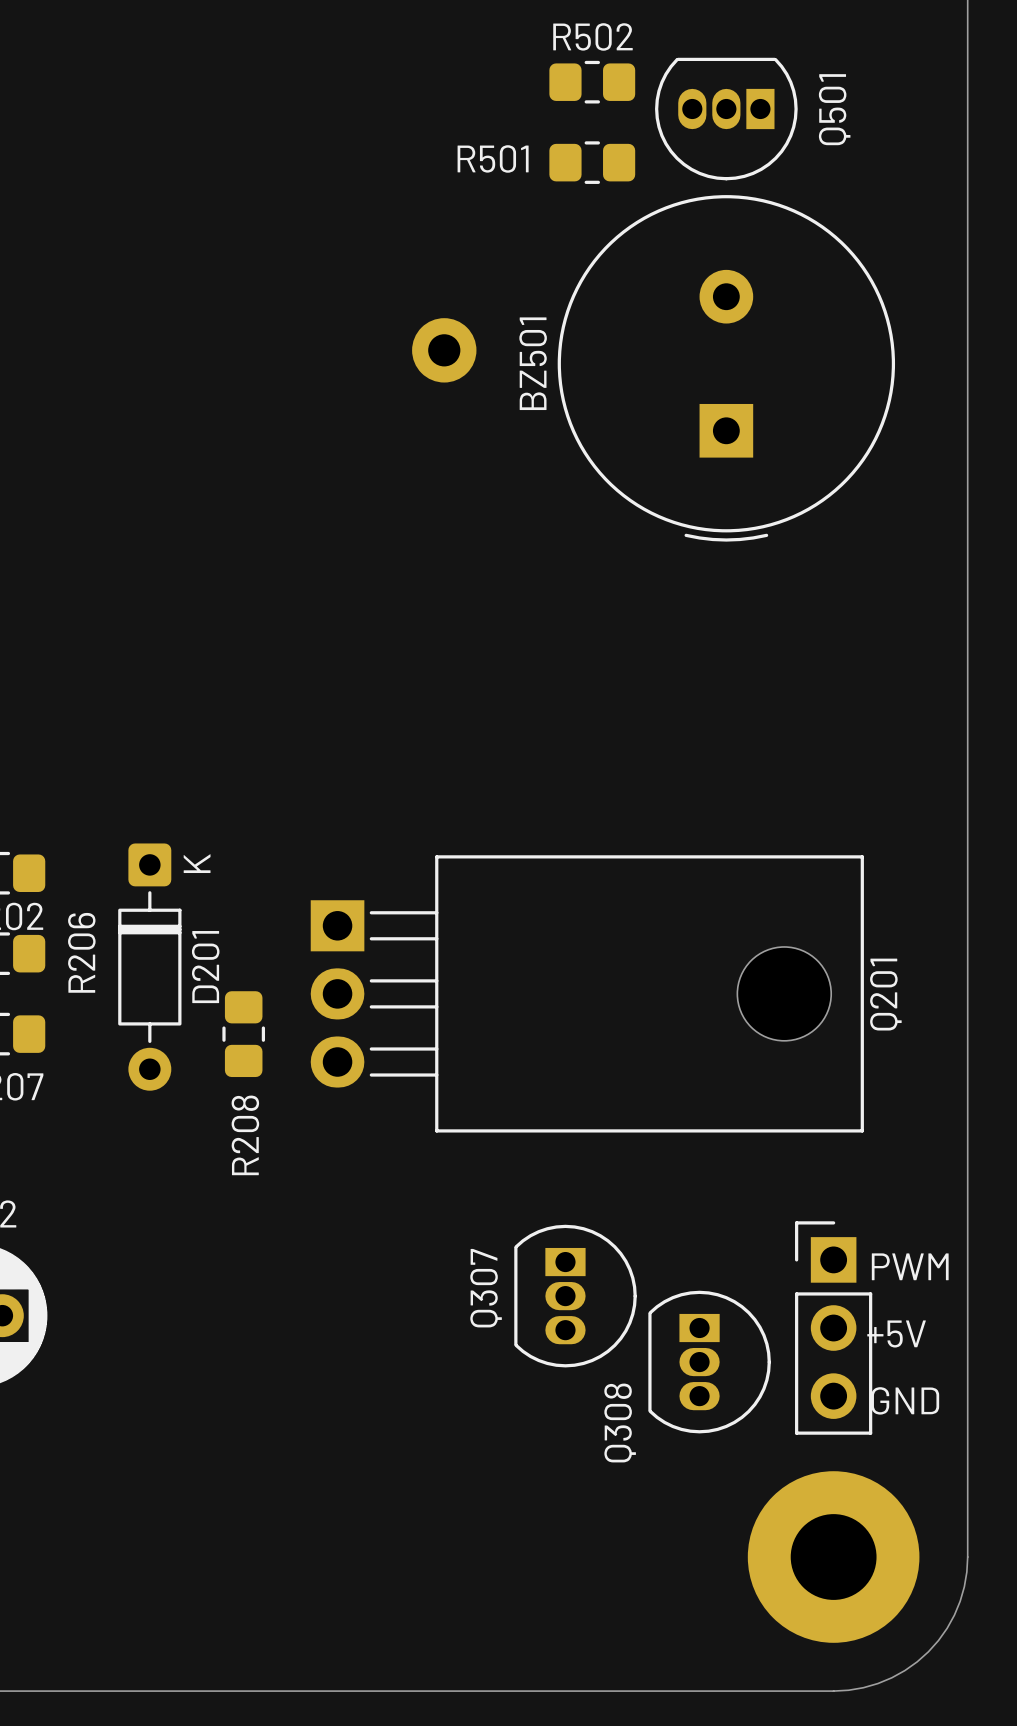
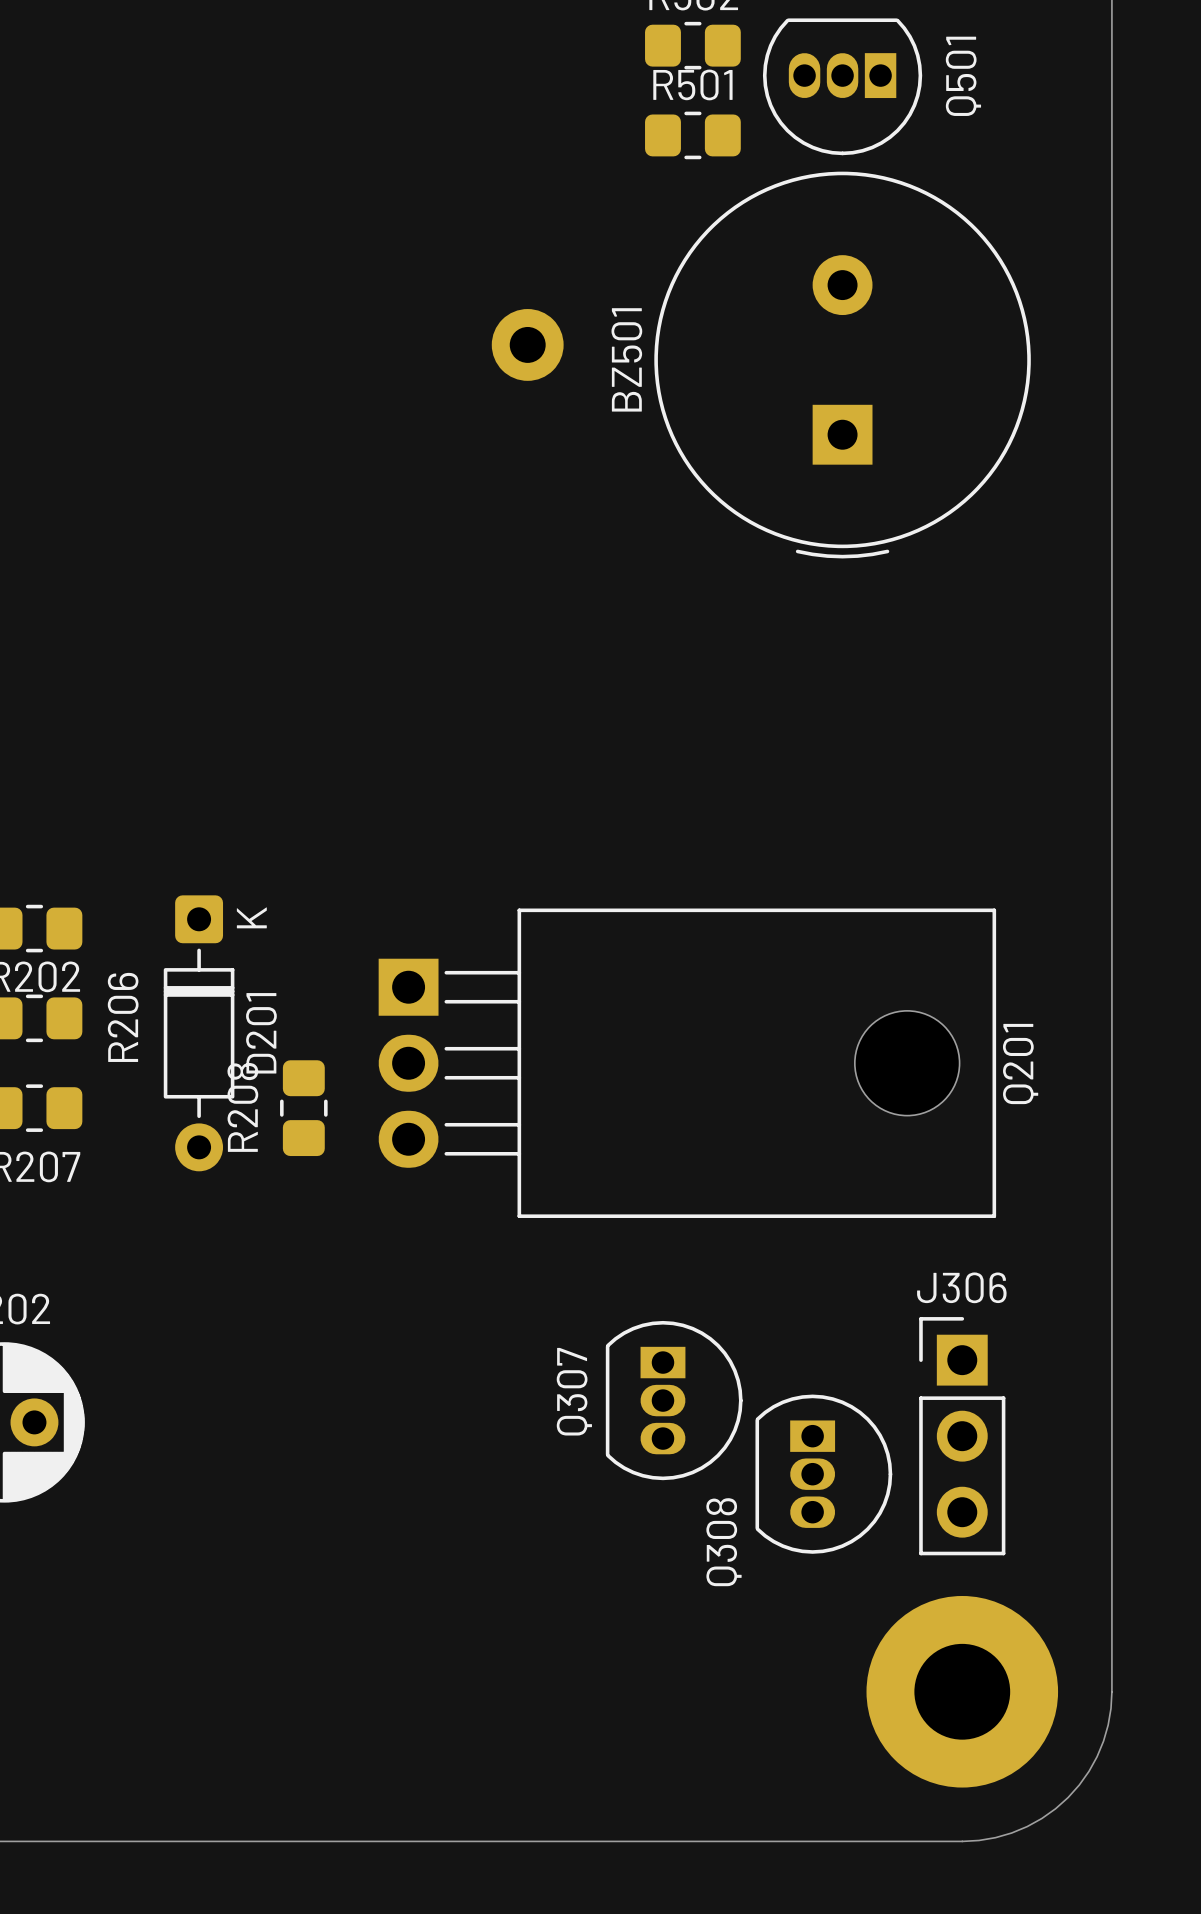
R501 name position: R501 (493, 158) -> R501 (692, 84)
R208 name position: R208 (245, 1135) -> R208 (242, 1107)
J306 name: none -> J306 (961, 1287)
text: PWM (910, 1266) -> none
text: +5V (896, 1333) -> none
text: GND (905, 1400) -> none

